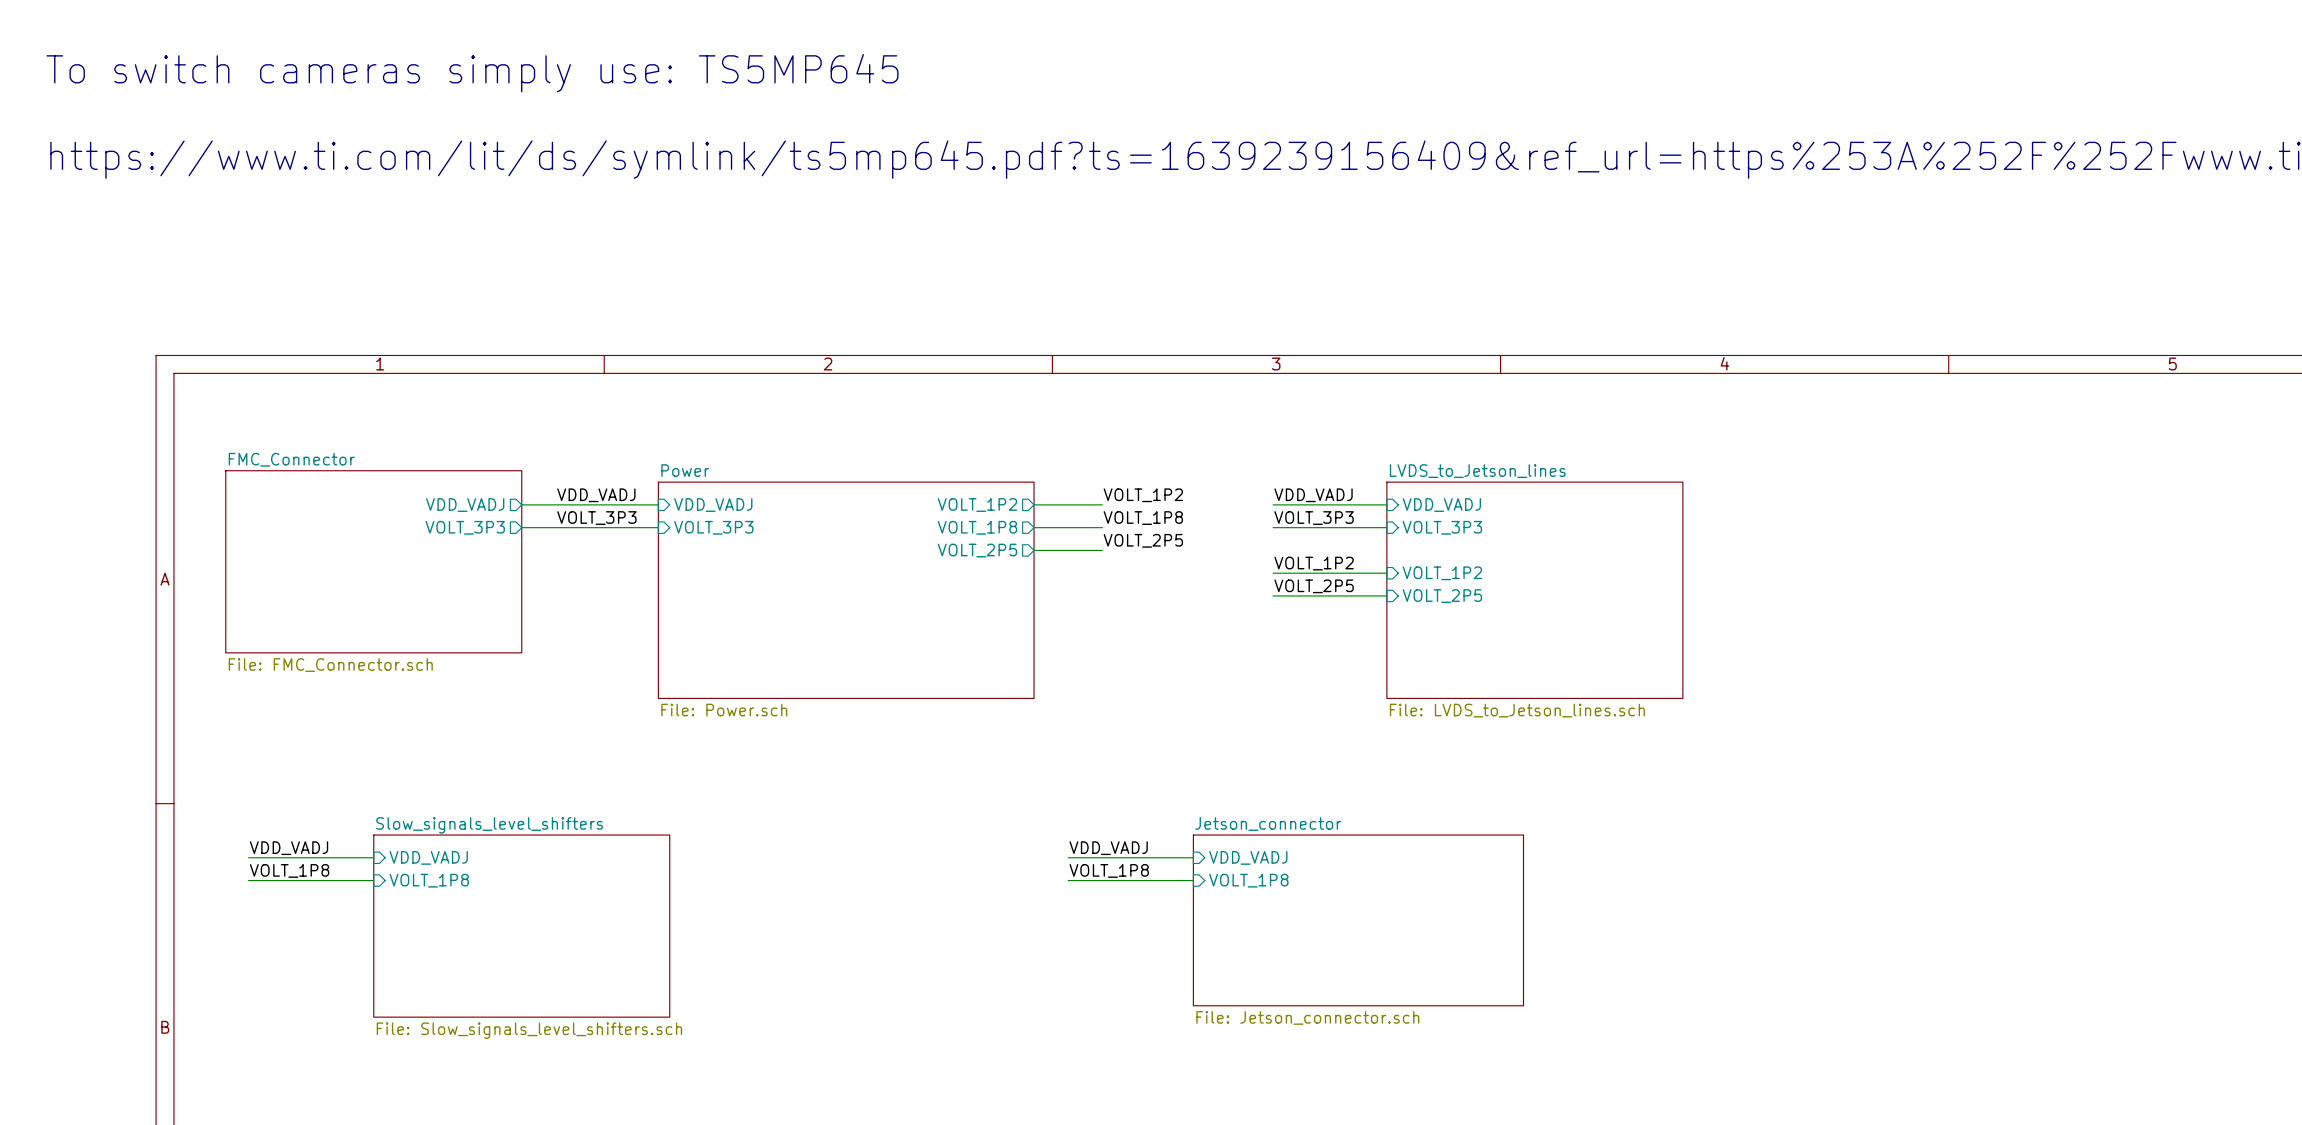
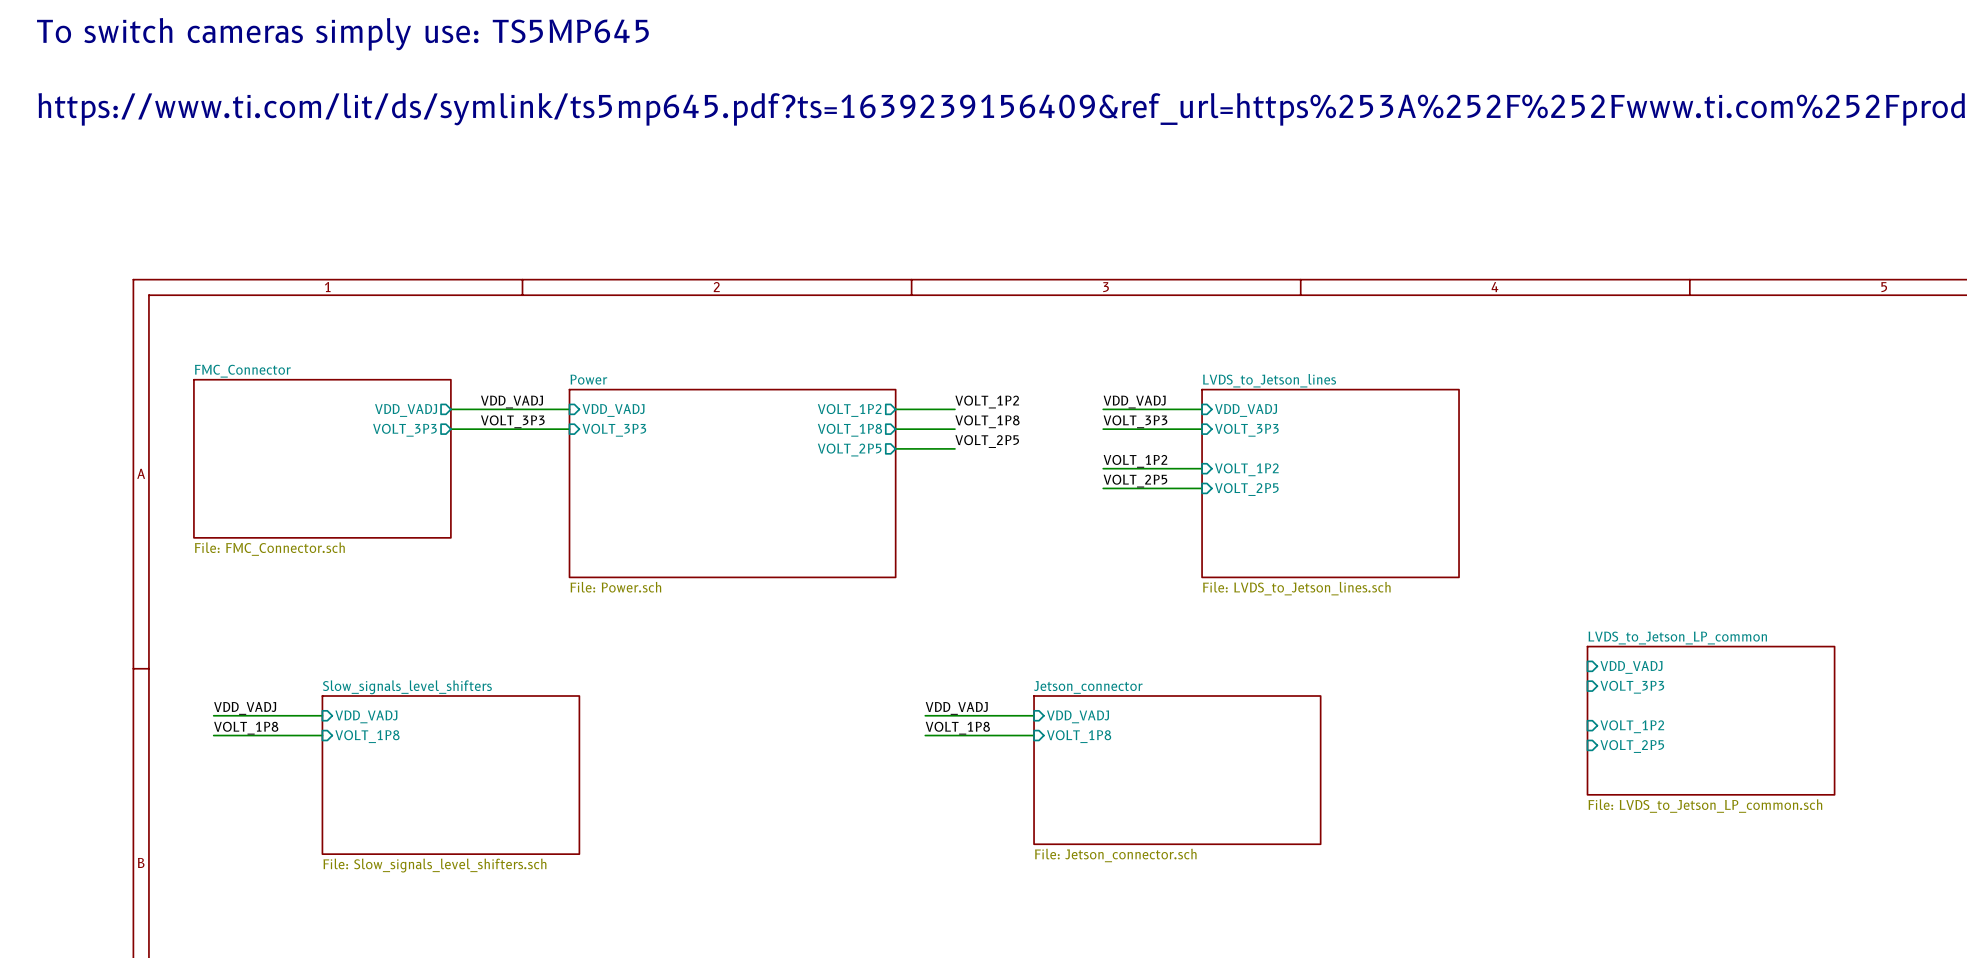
sheet pin: none -> VDD_VADJ (1631, 667)
sheet pin: none -> VOLT_3P3 (1632, 687)
sheet LVDS_to_Jetson_LP_common: none -> File: LVDS_to_Jetson_LP_common.sch (1711, 720)
sheet pin: none -> VOLT_1P2 (1632, 726)
sheet pin: none -> VOLT_2P5 (1632, 746)

